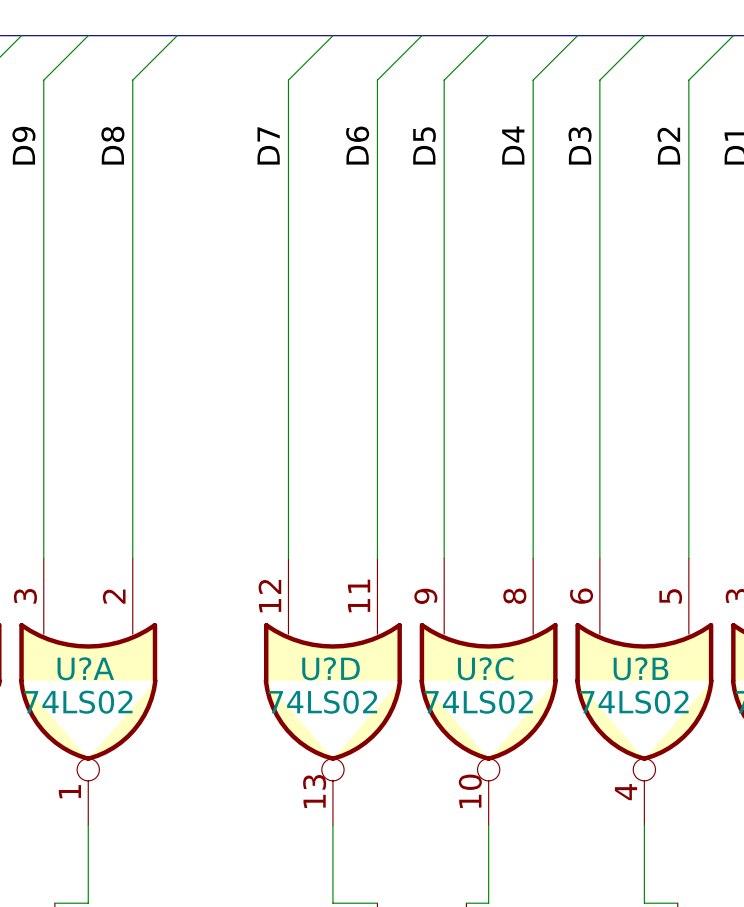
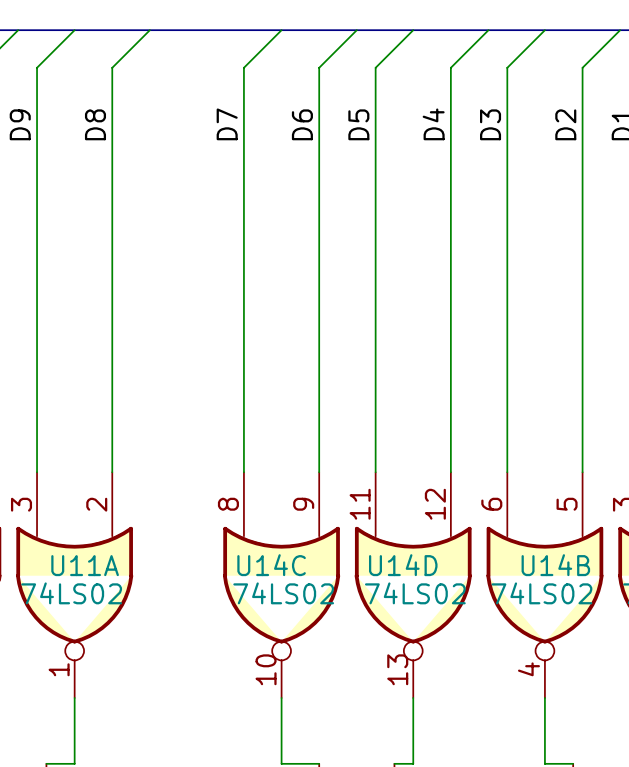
U?A name: U?A (85, 668) -> U11A (85, 565)
U?B name: U?B (640, 668) -> U14B (555, 565)
U?D: 74LS02 (332, 691) -> none
U14C: none -> 74LS02 (281, 585)
U?C: 74LS02 (488, 691) -> none
U14D: none -> 74LS02 (413, 585)

